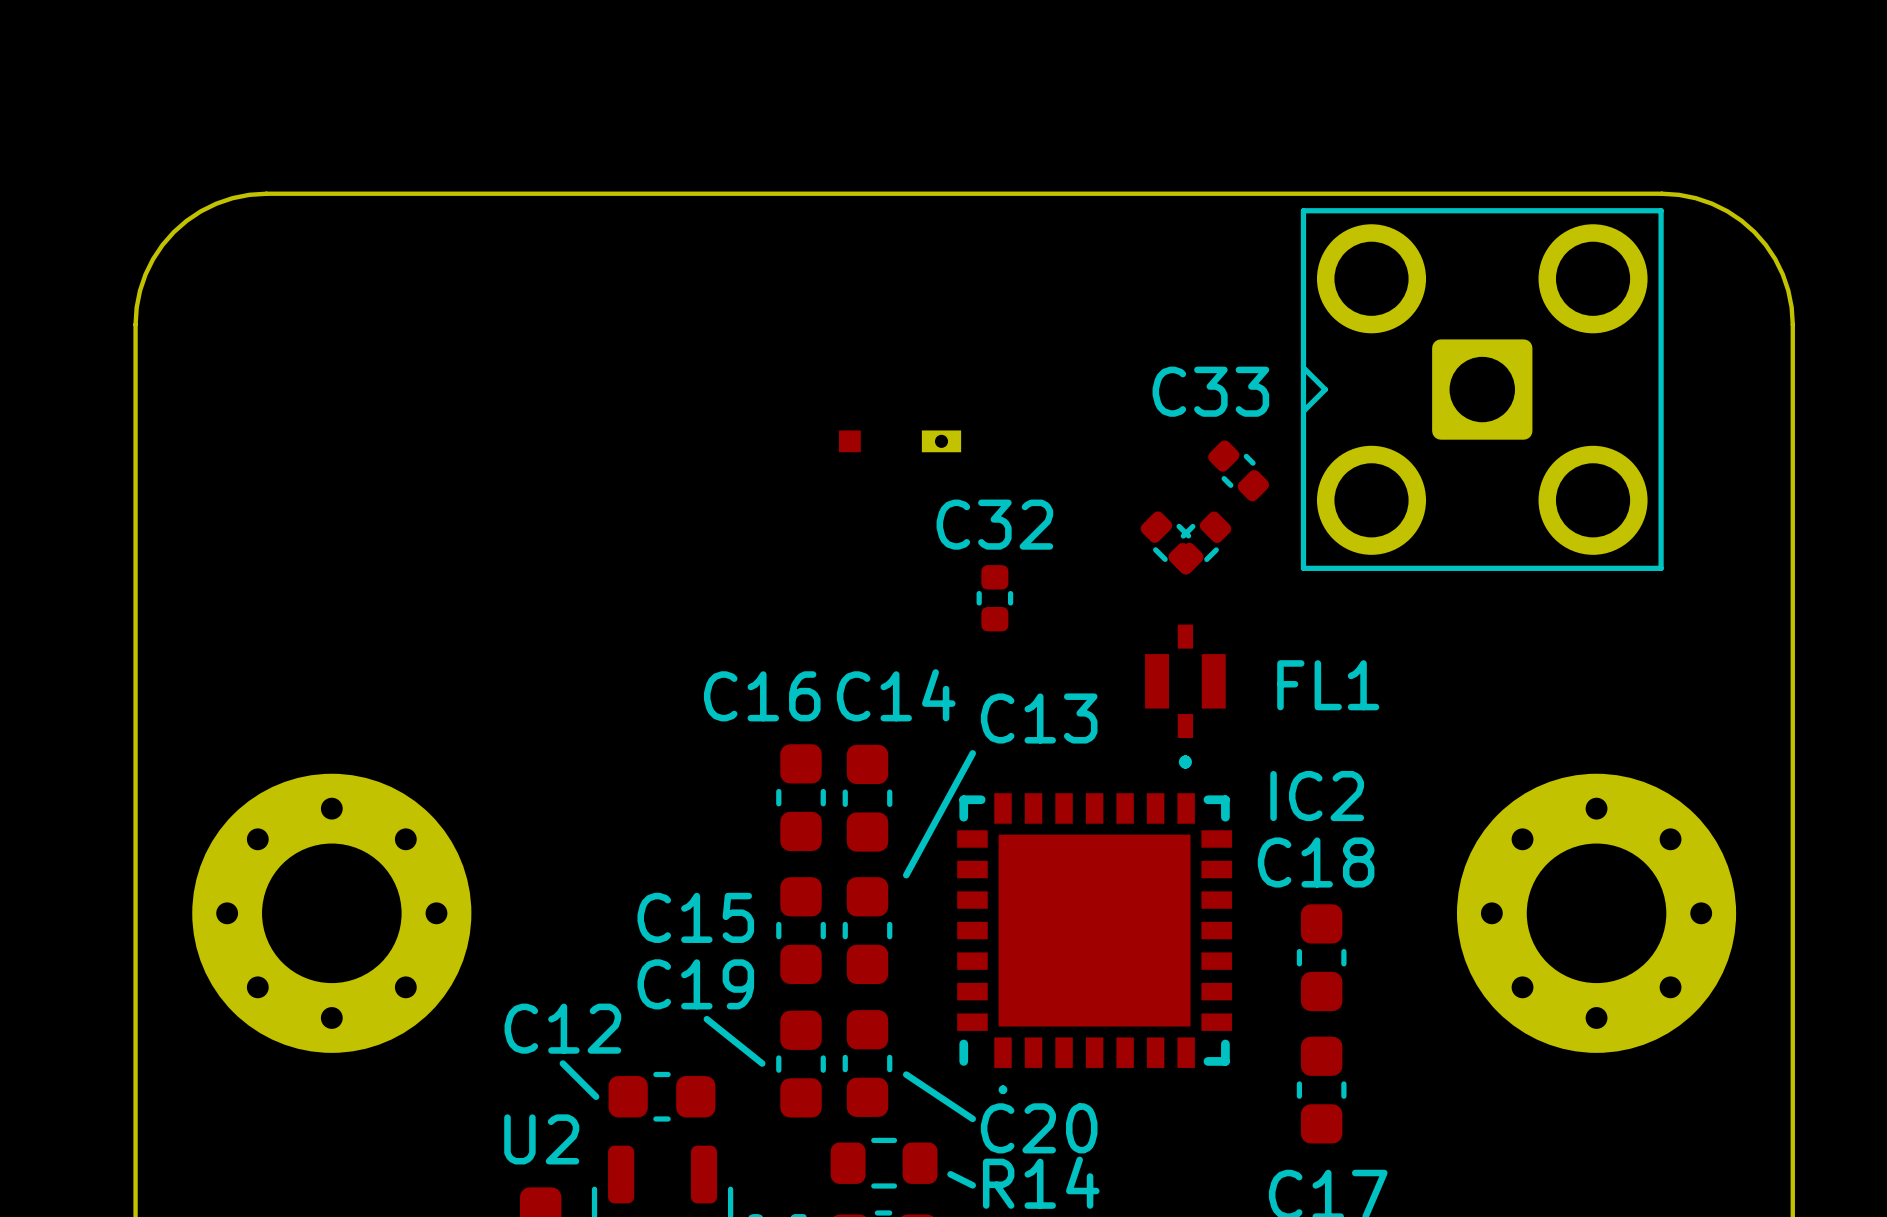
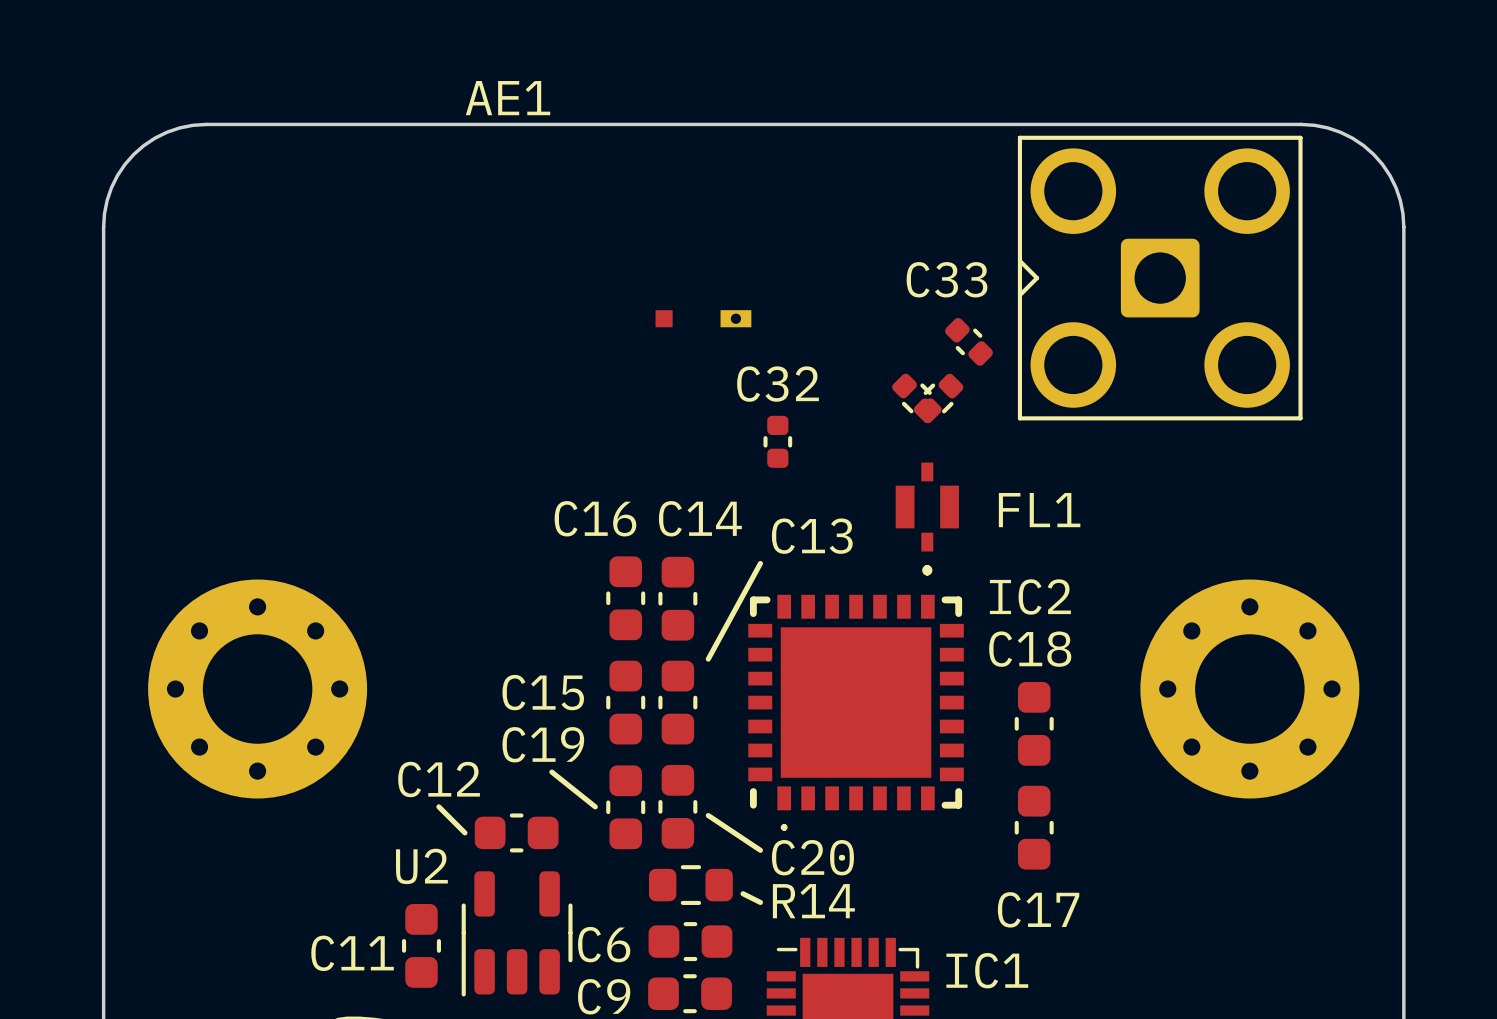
AE1 name: none -> AE1 (508, 98)

